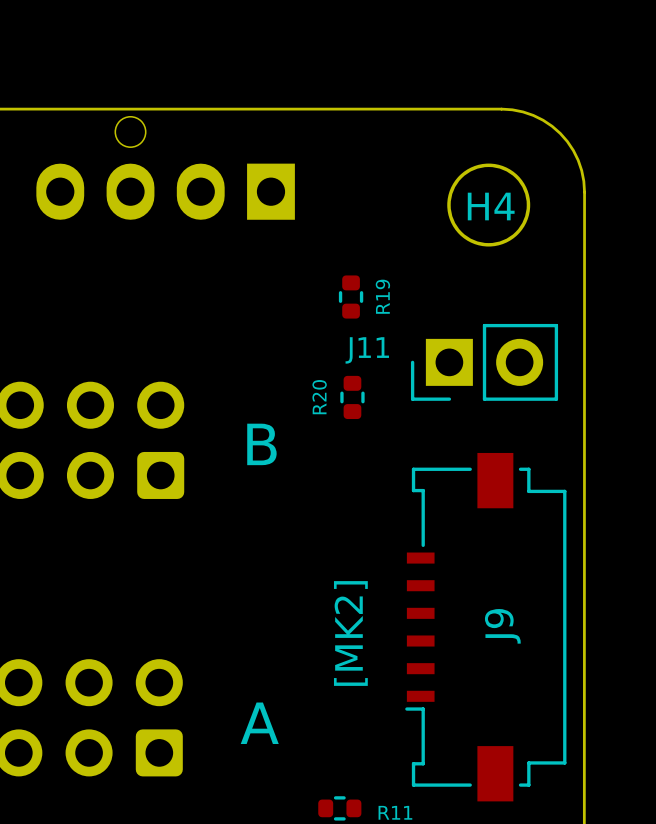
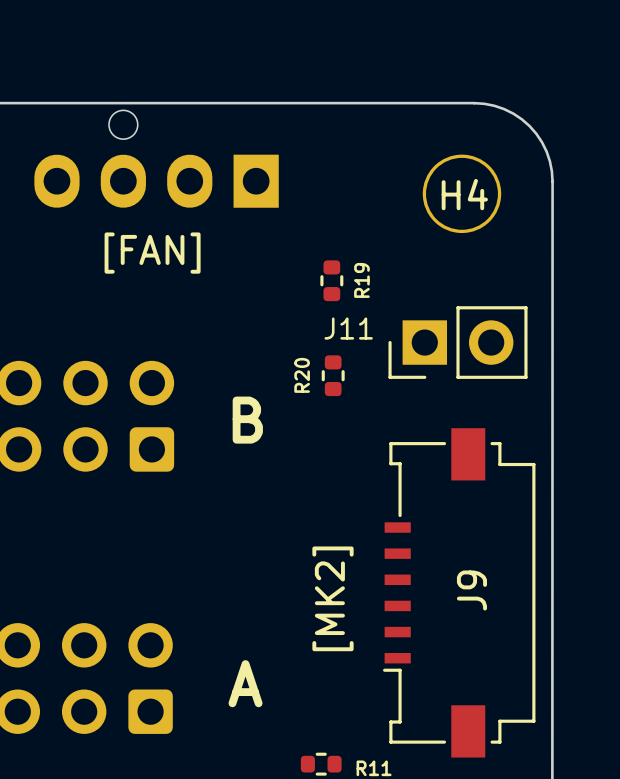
text: none -> [FAN] (152, 253)

